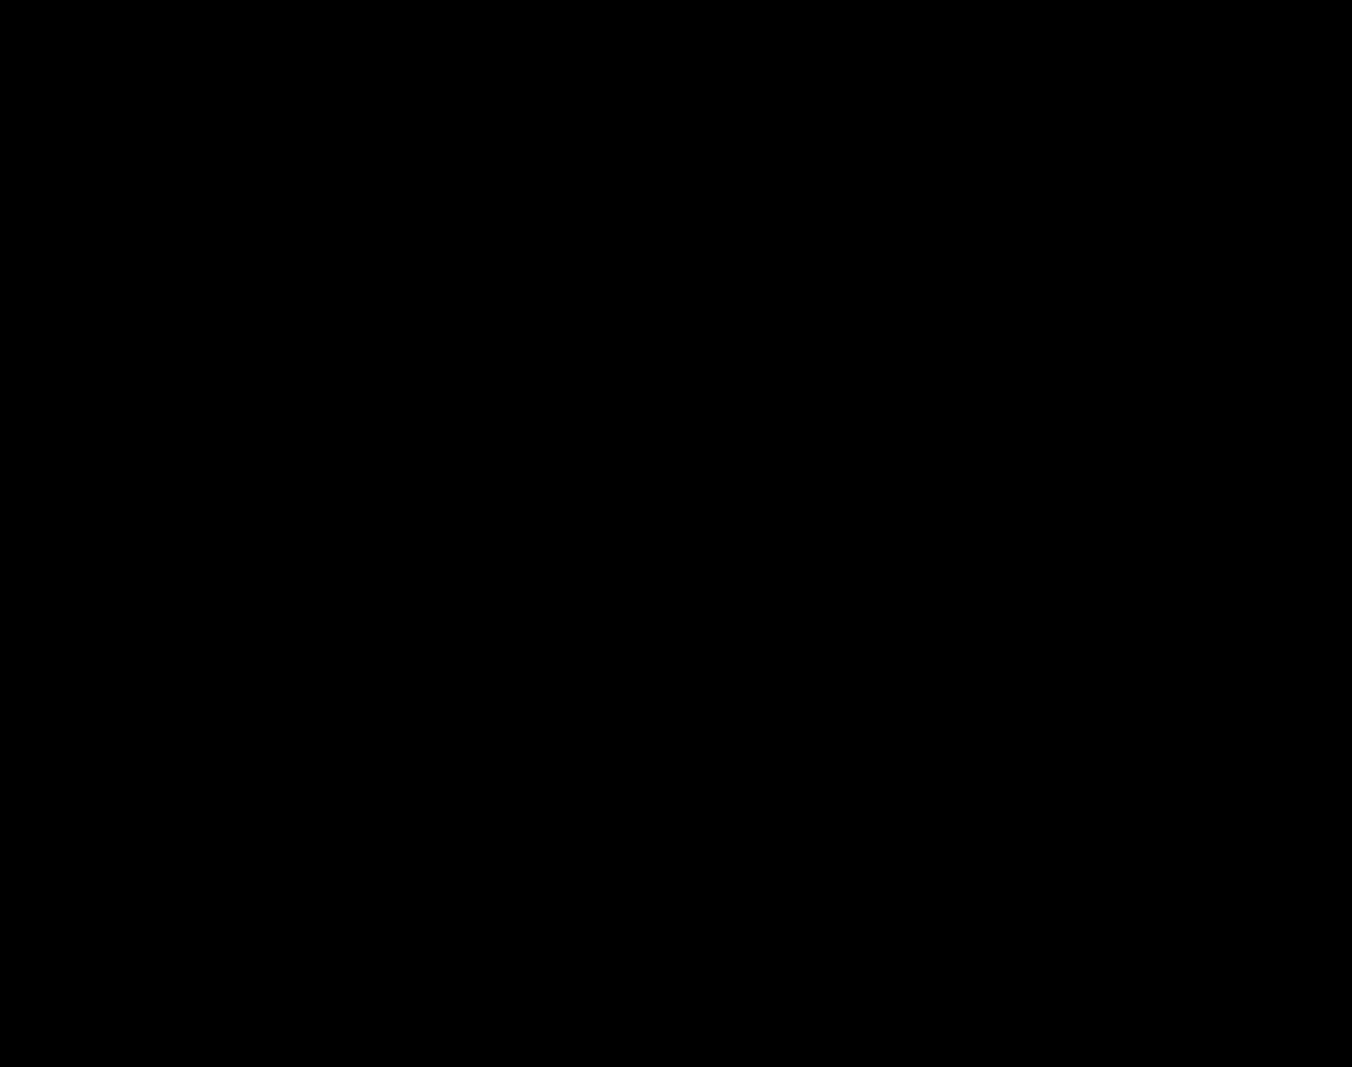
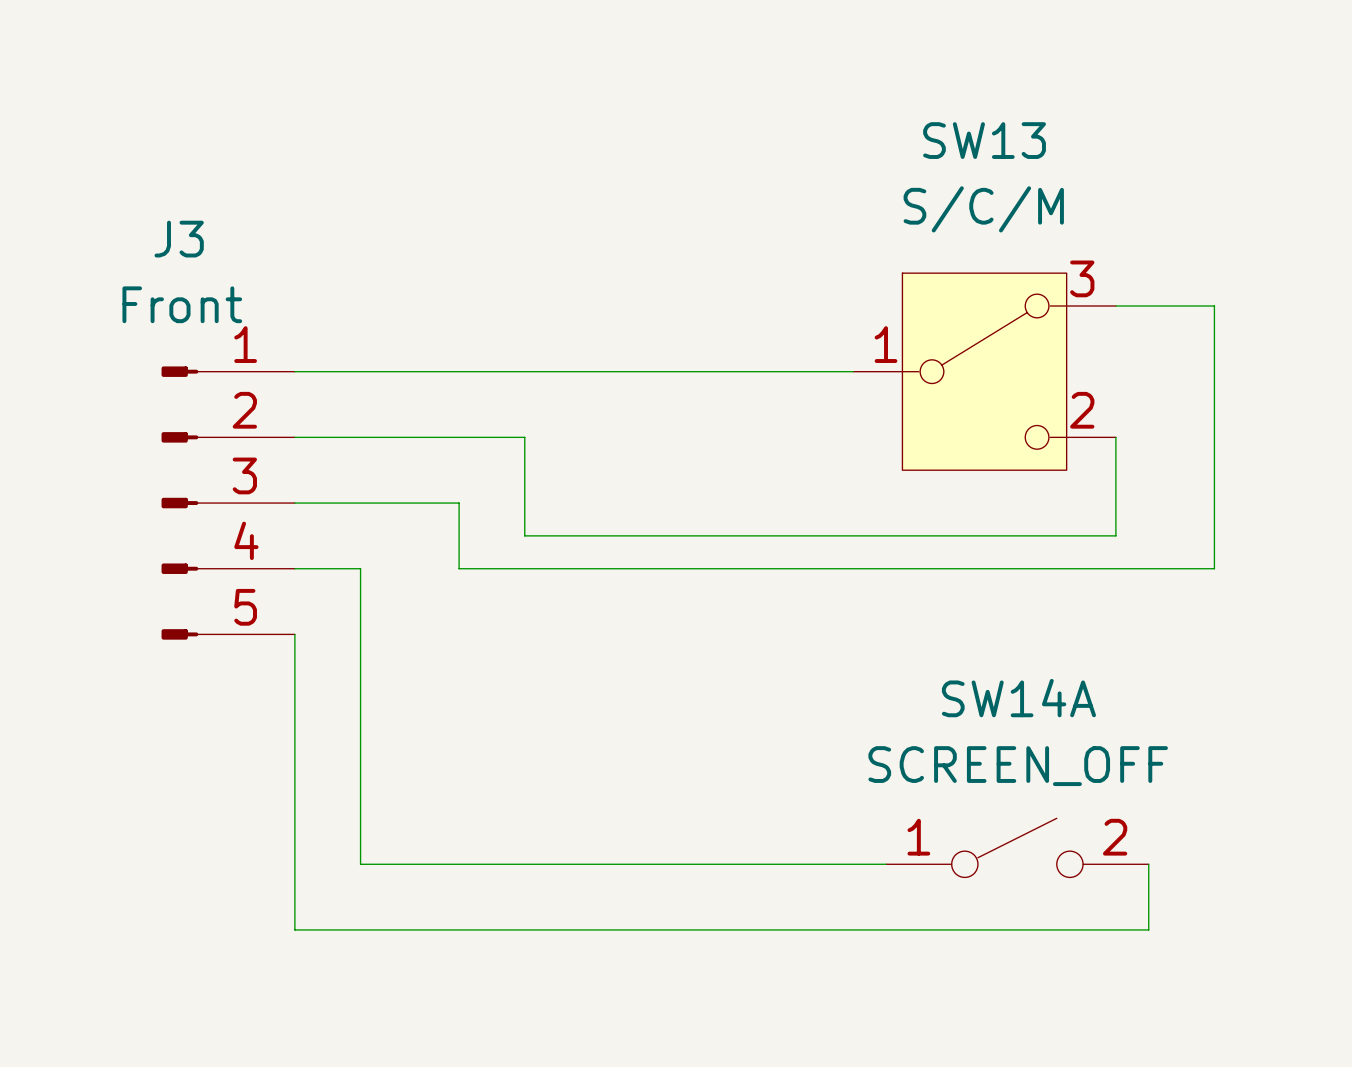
wire: none -> (1115, 305) (1214, 305) (1214, 568) (459, 568) (459, 503) (294, 503)
wire: none -> (294, 371) (853, 371)
SW13: none -> S/C/M (984, 371)
wire: none -> (294, 437) (524, 437) (524, 535) (1115, 535) (1115, 437)
J3: none -> Front (228, 503)
wire: none -> (294, 568) (360, 568) (360, 864) (886, 864)
wire: none -> (294, 634) (294, 929) (1148, 929) (1148, 864)
SW14A: none -> SCREEN_OFF (1017, 847)

